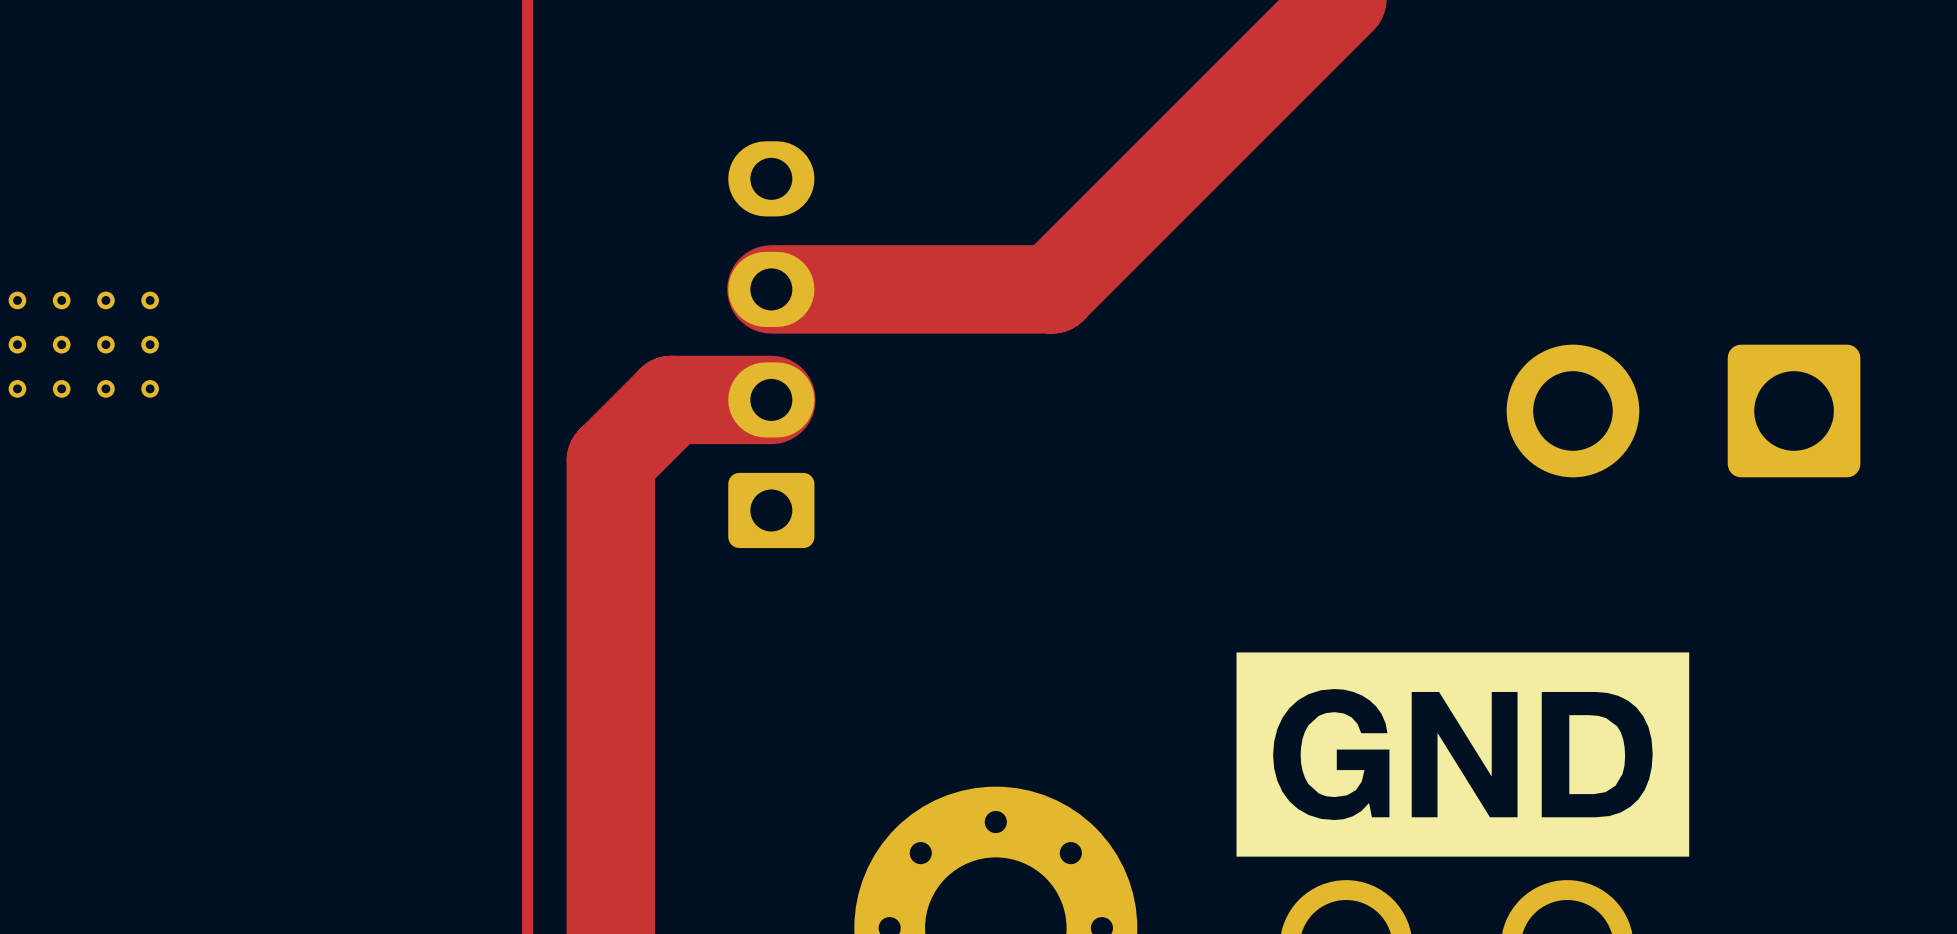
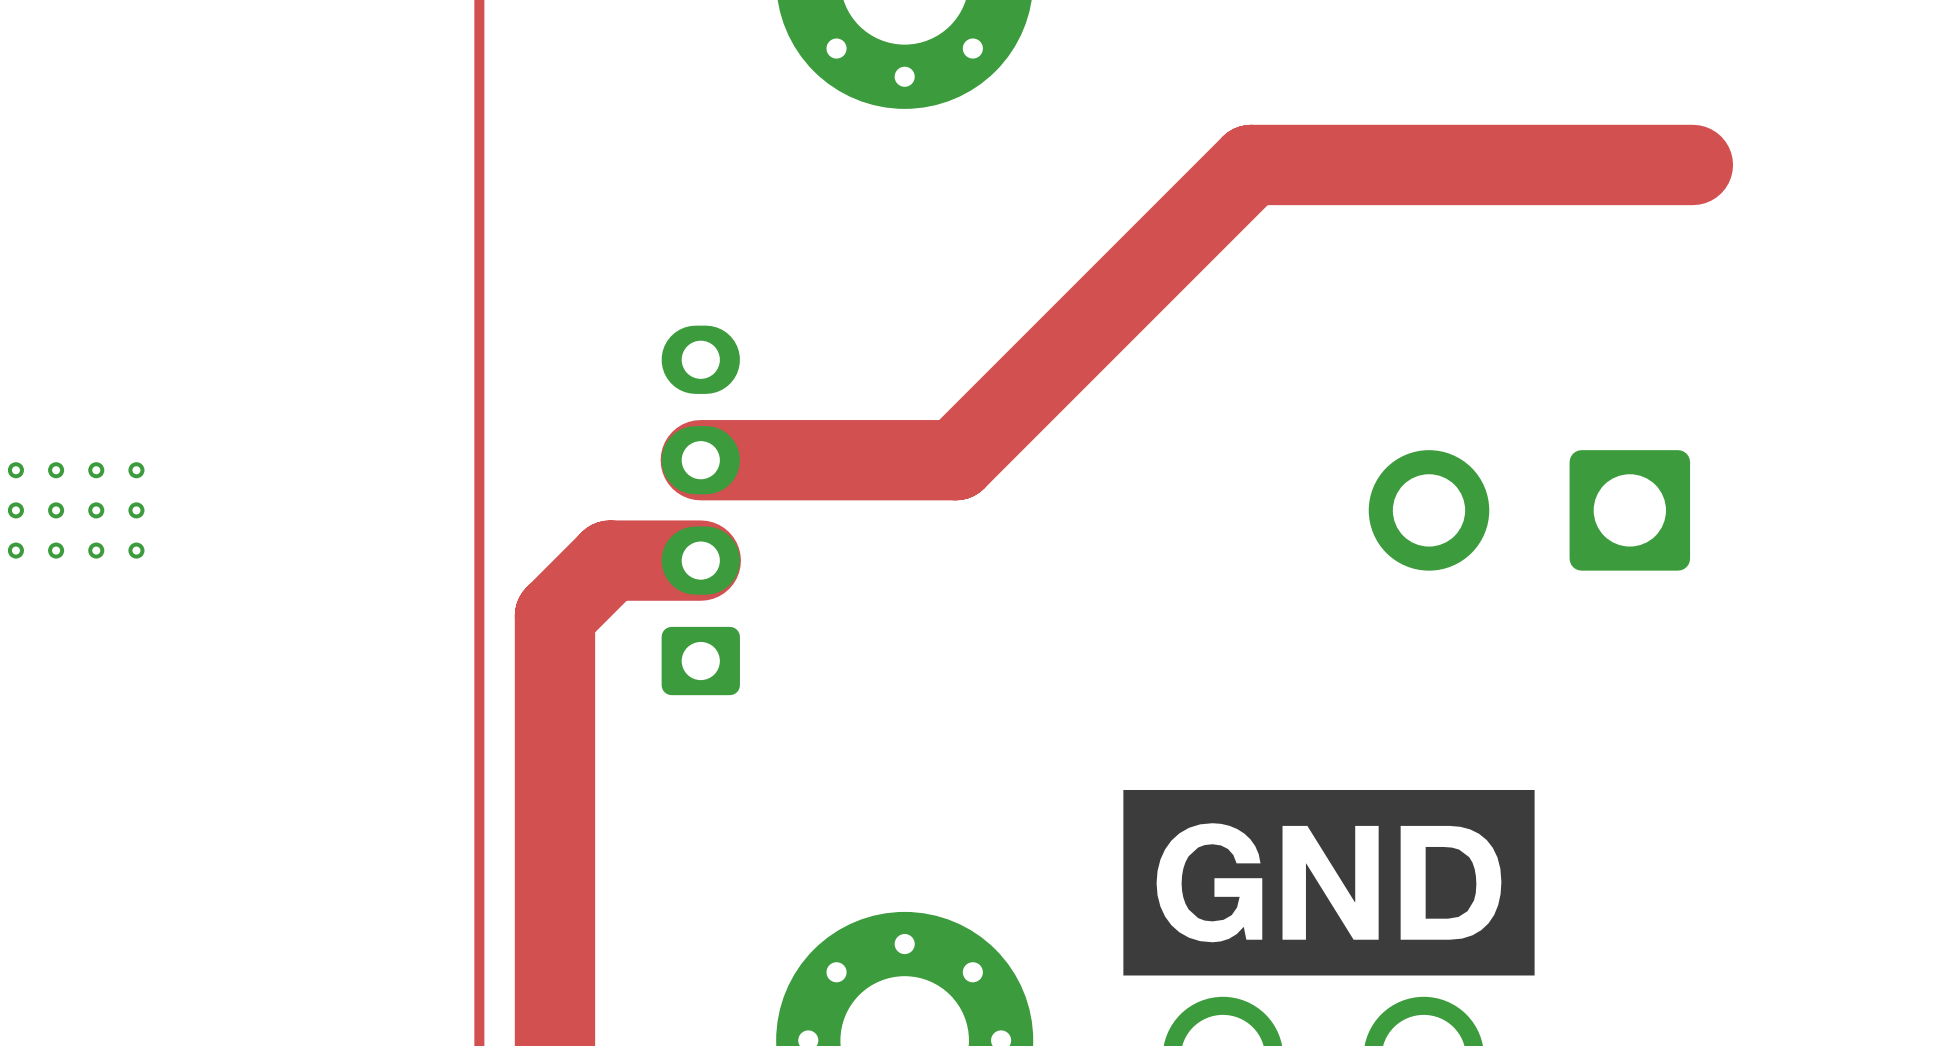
part position: (1683, 410) -> (1529, 510)

